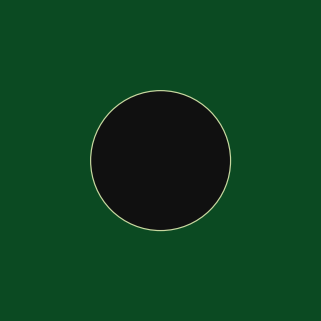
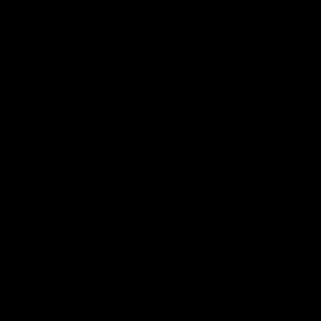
part: (160, 160) -> none

